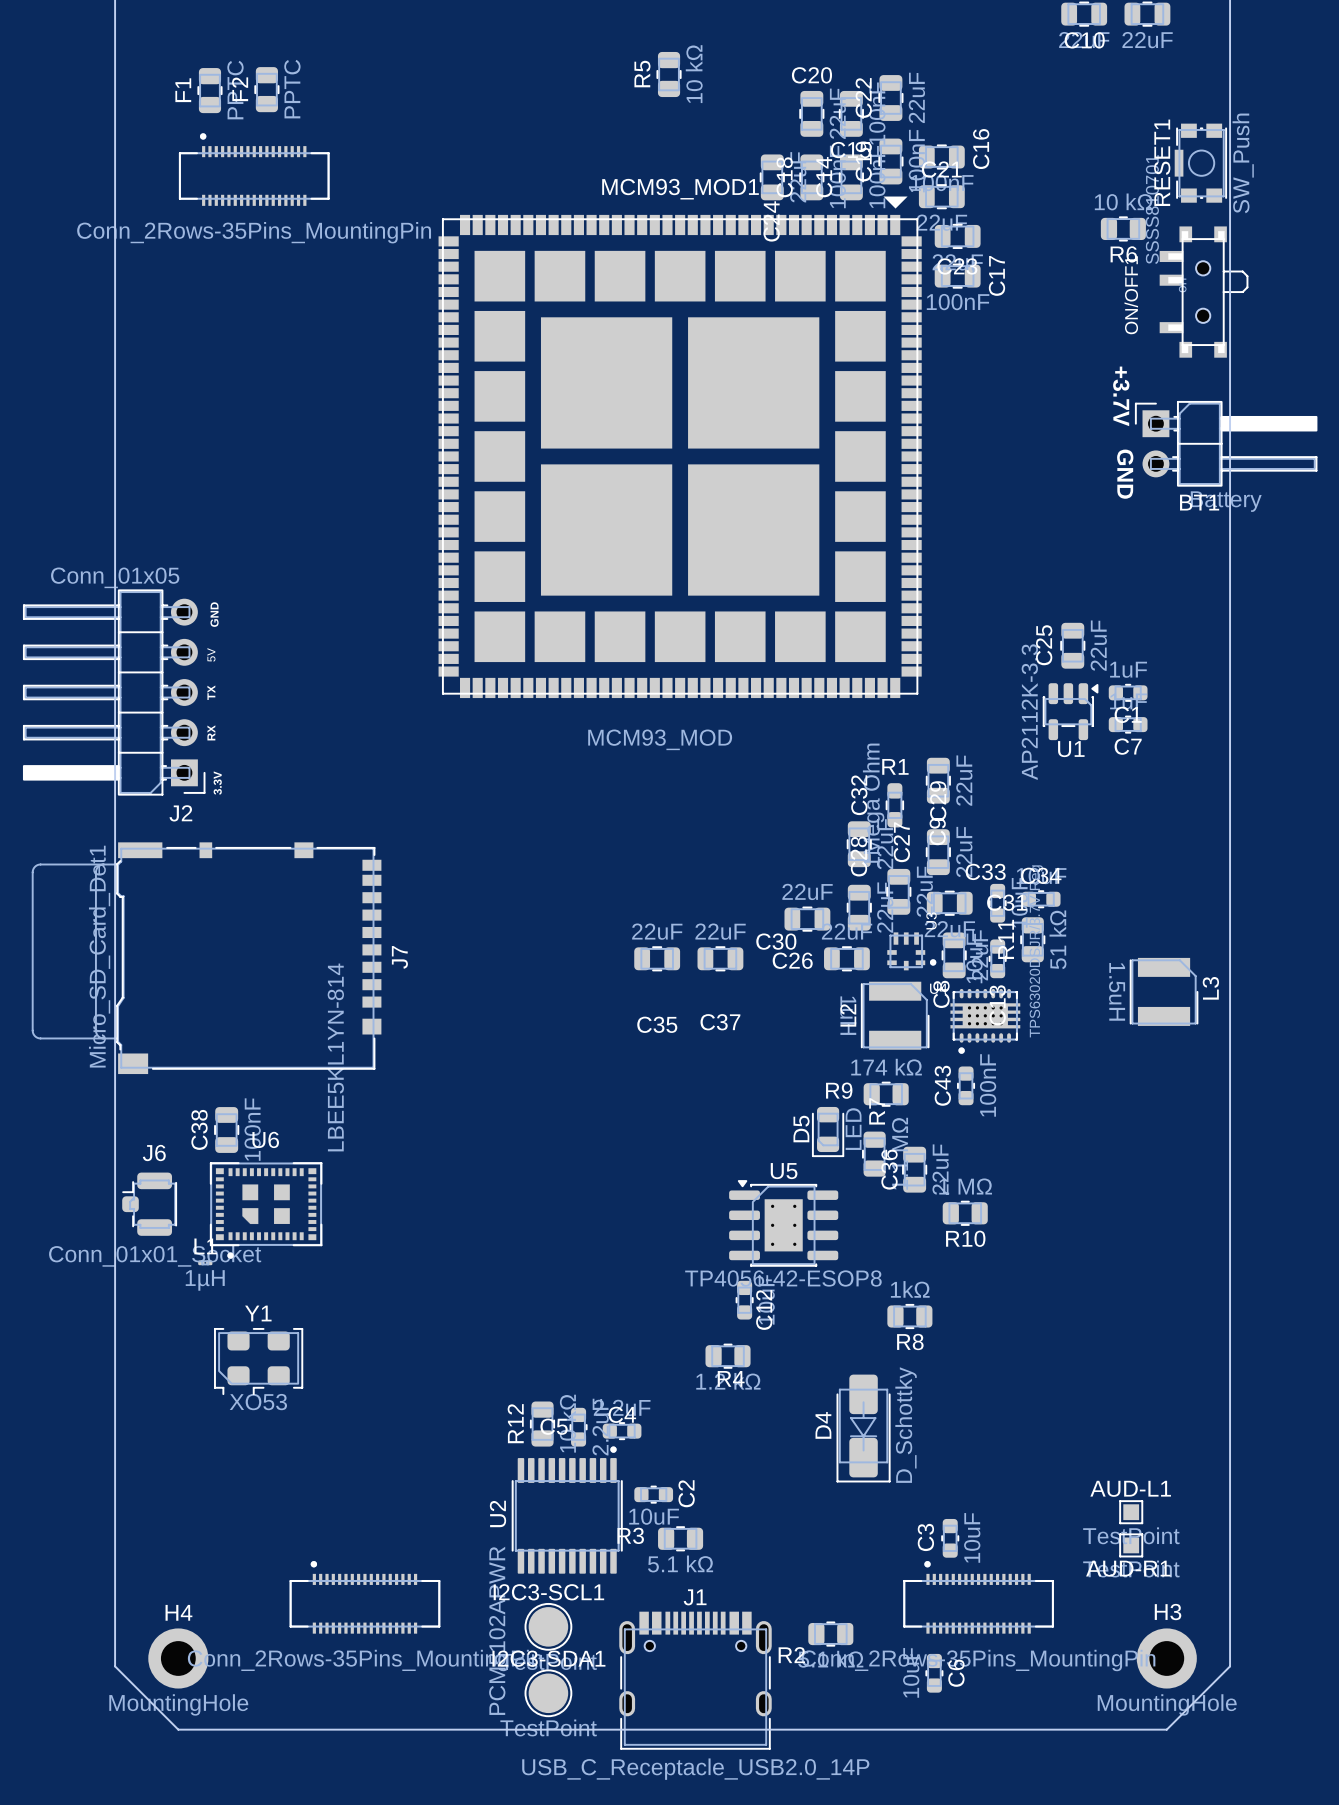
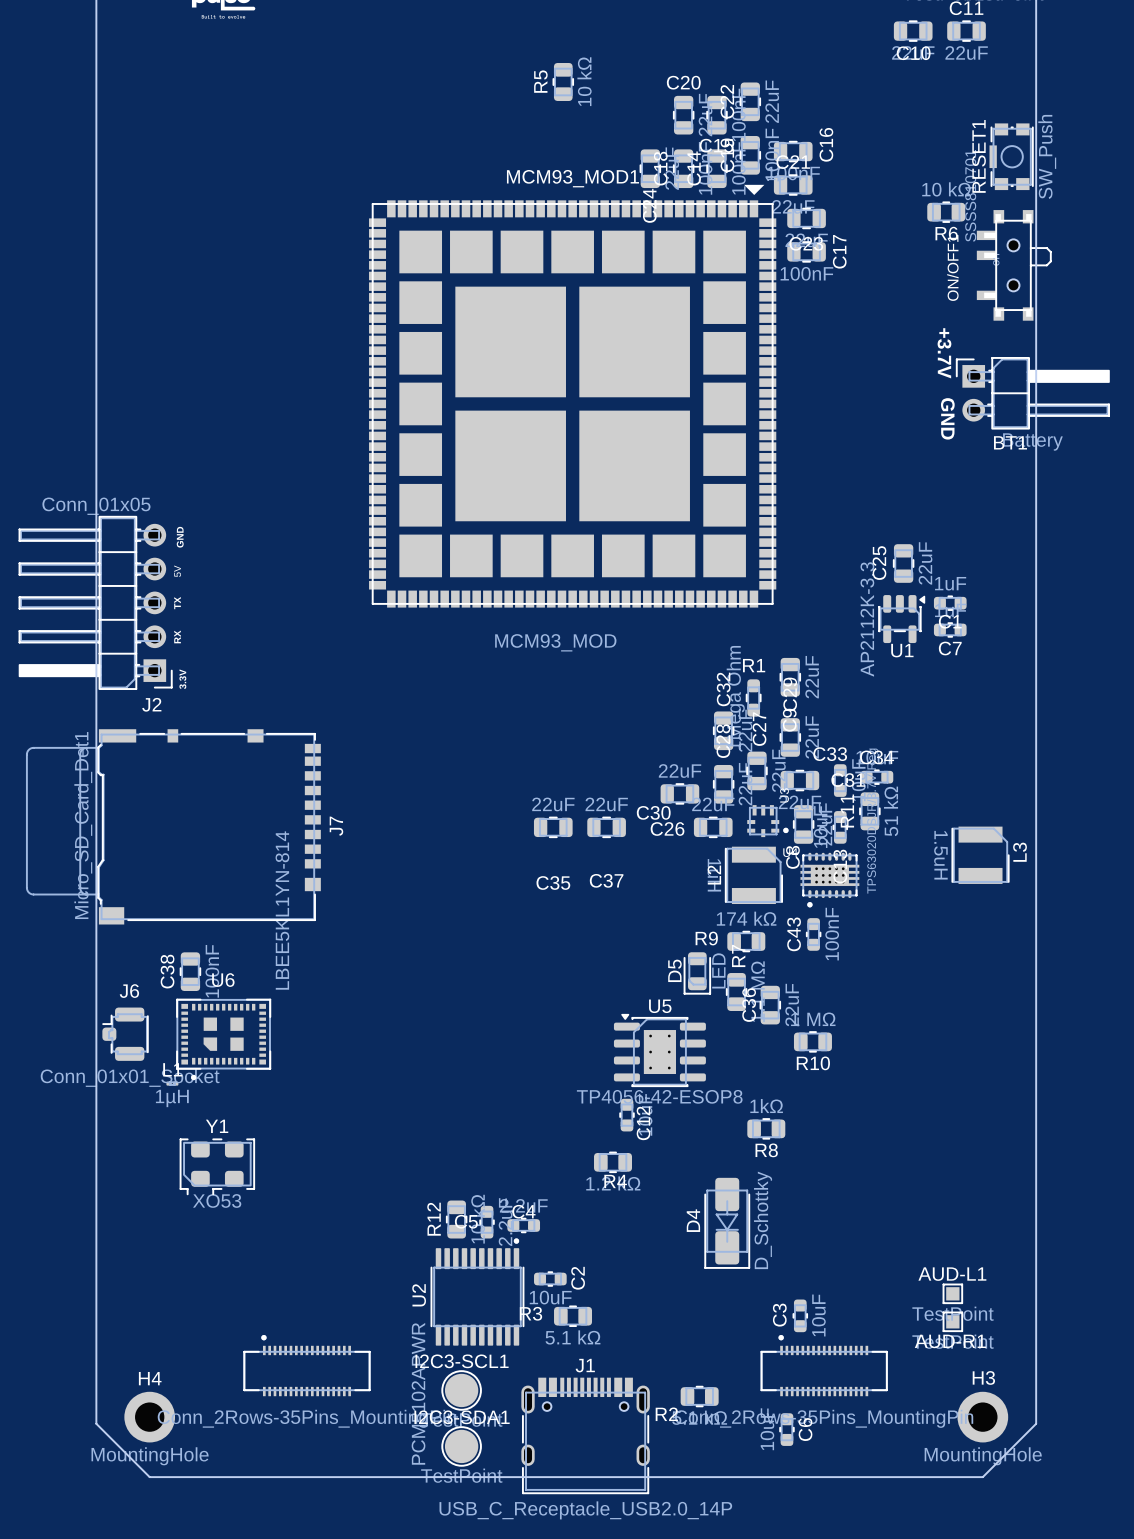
F2: PPTC (266, 89) -> none
F1: PPTC (209, 90) -> none
part: Conn_2Rows-35Pins_MountingPin (254, 169) -> none

